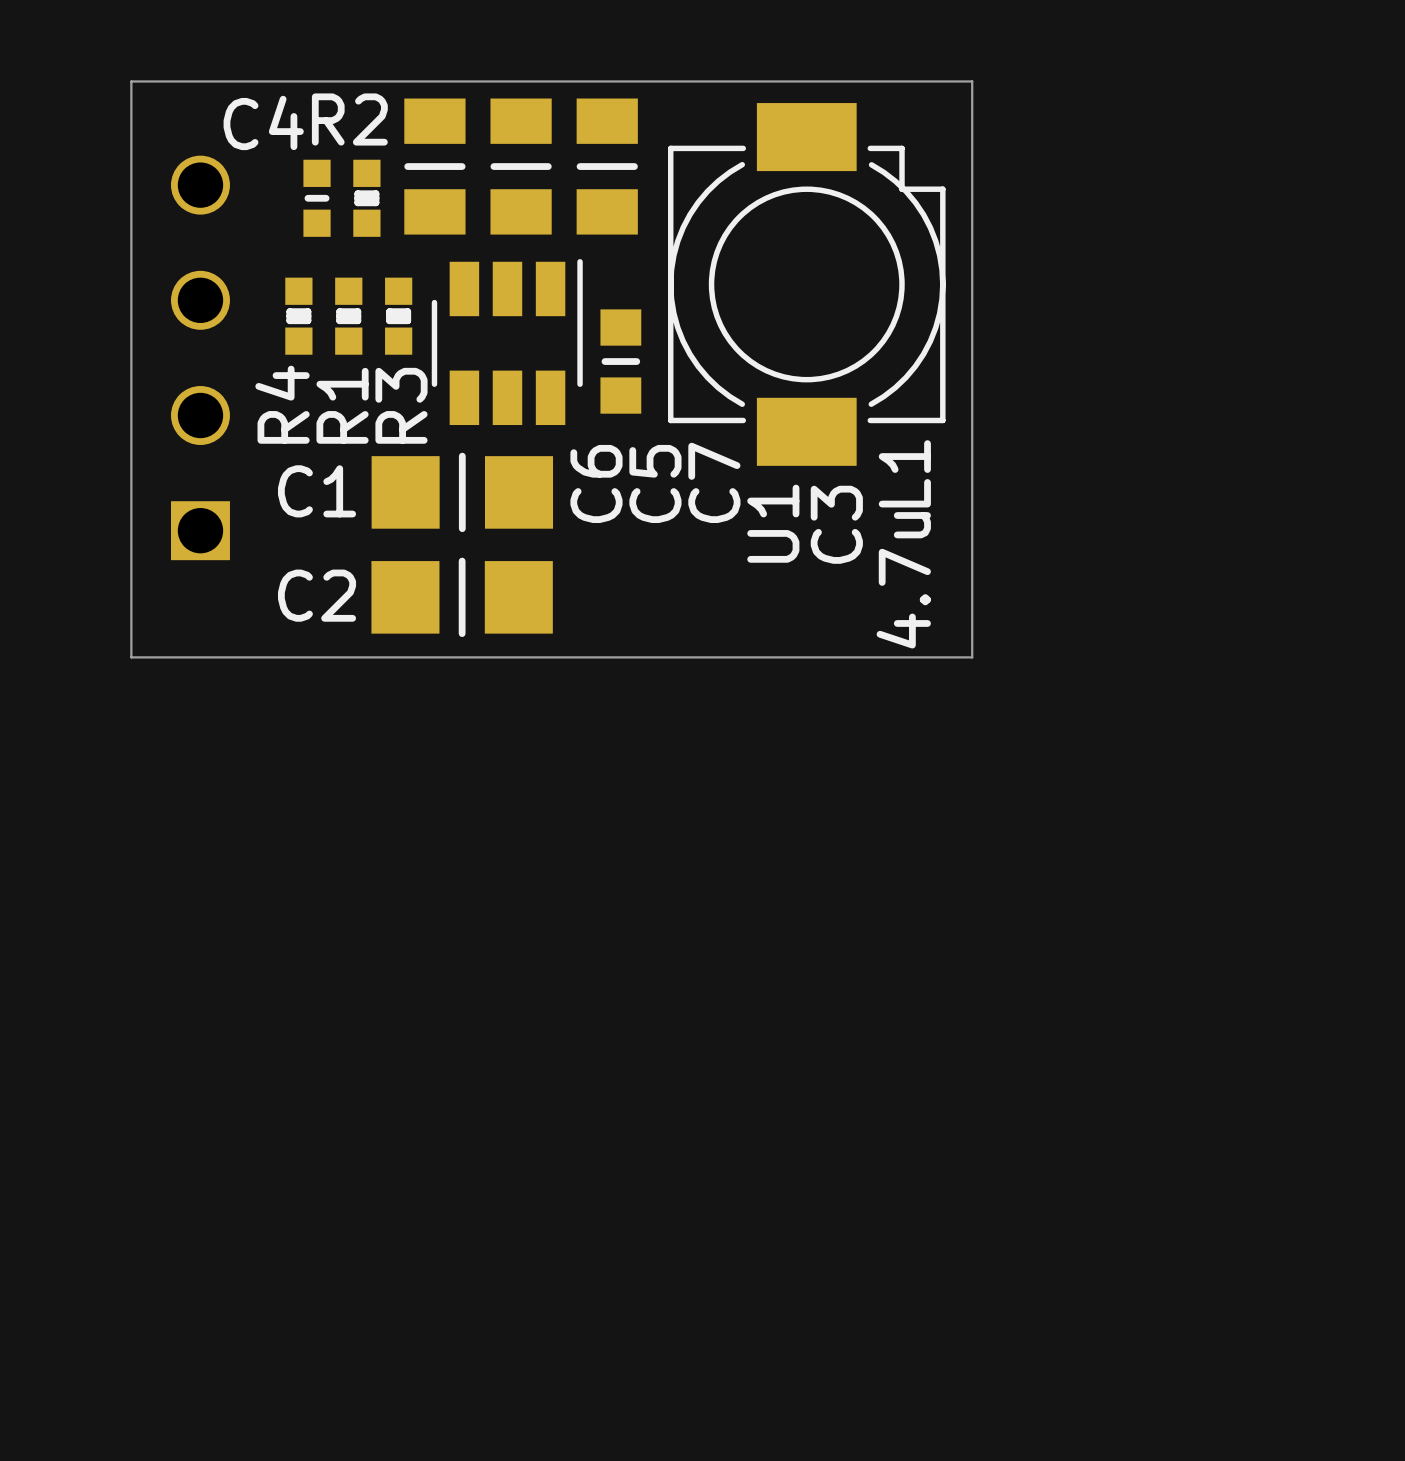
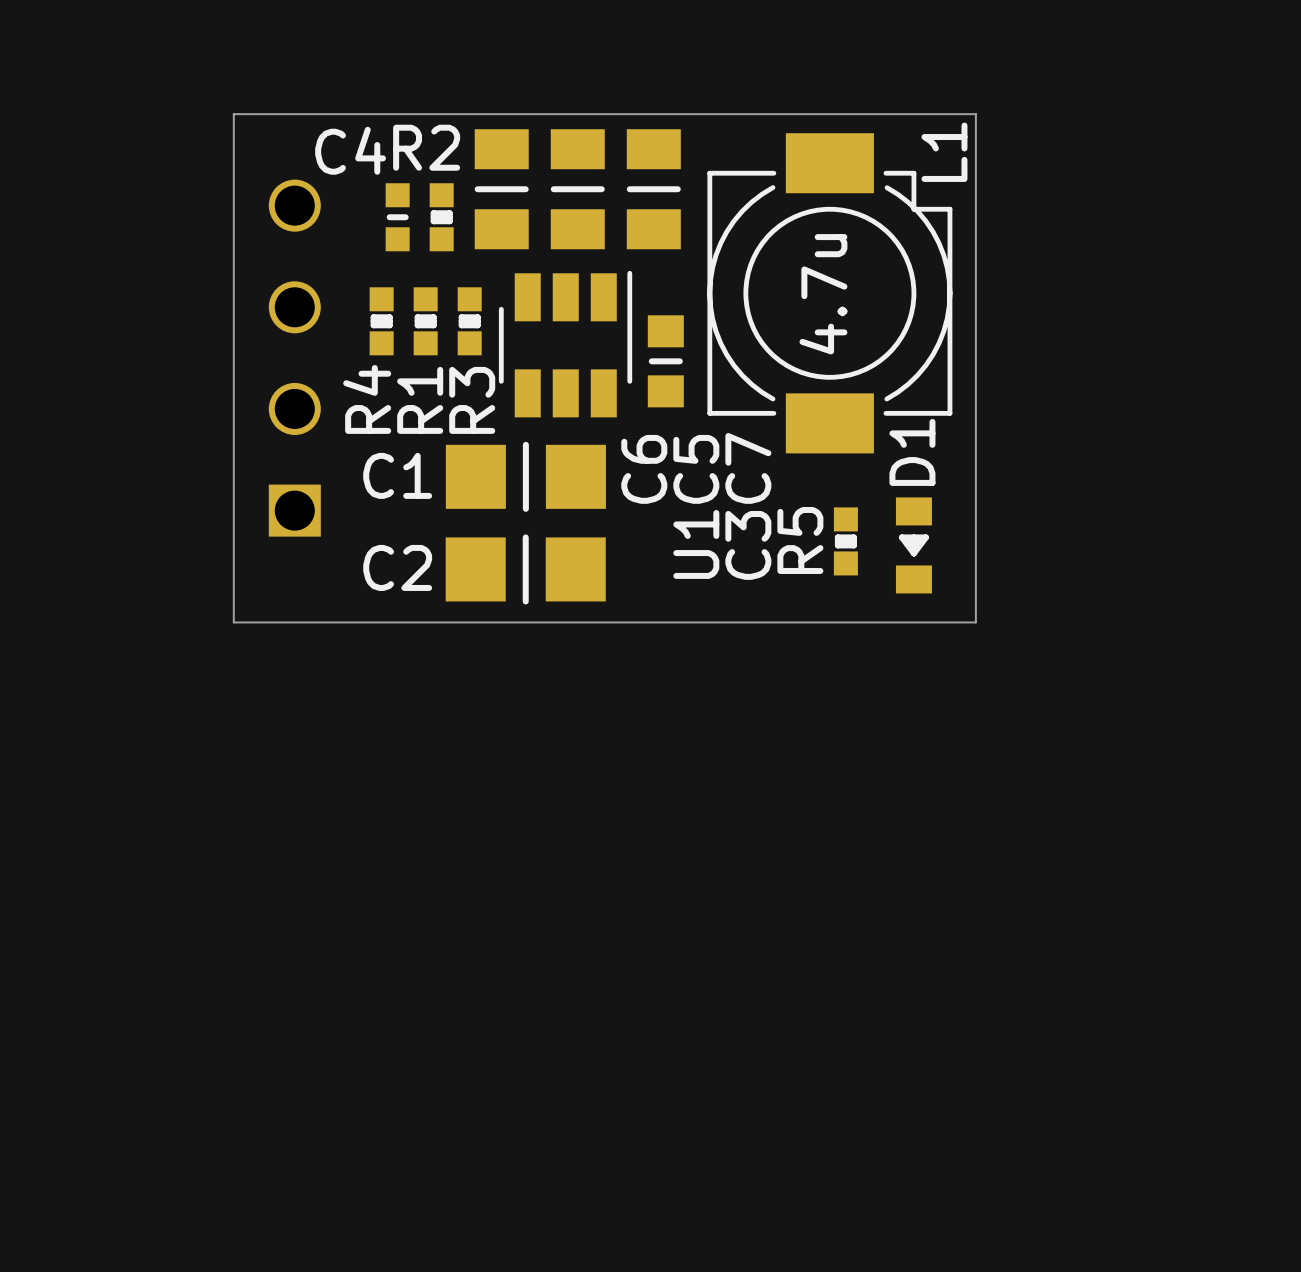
L1 name position: L1 (904, 473) -> L1 (944, 152)
U1 name position: U1 (773, 523) -> U1 (696, 544)
C3 name position: C3 (836, 524) -> C3 (748, 545)
R5: none -> (845, 541)
D1: none -> (913, 545)
L1 value position: 4.7u (903, 580) -> 4.7u (823, 294)

